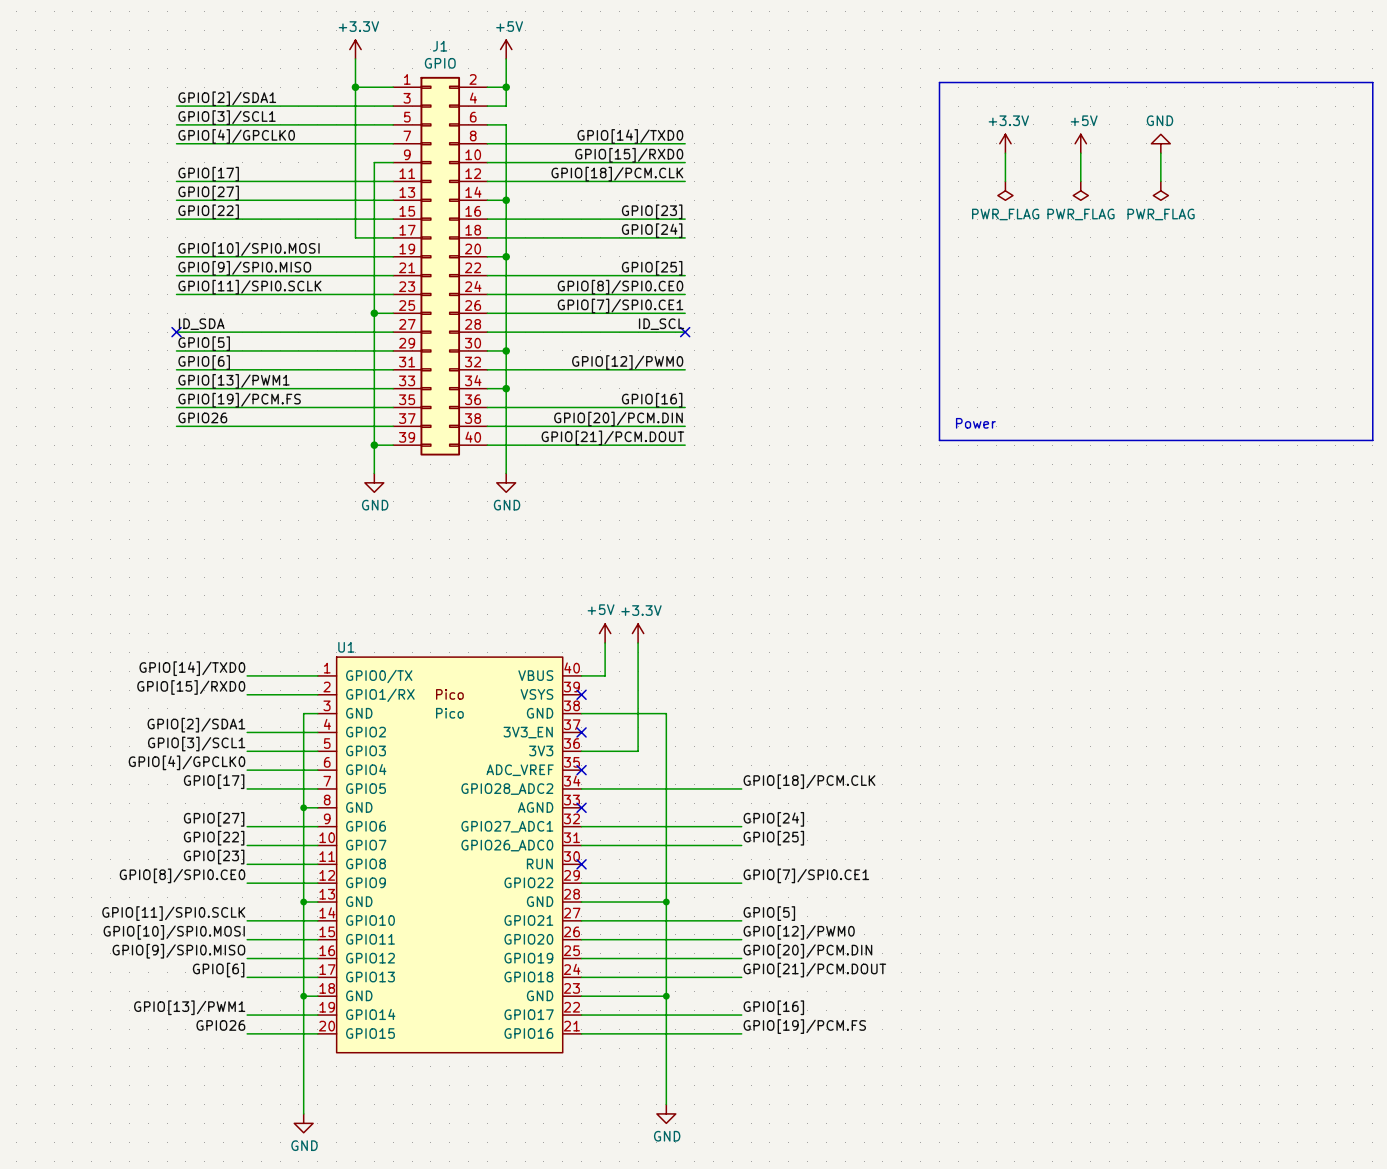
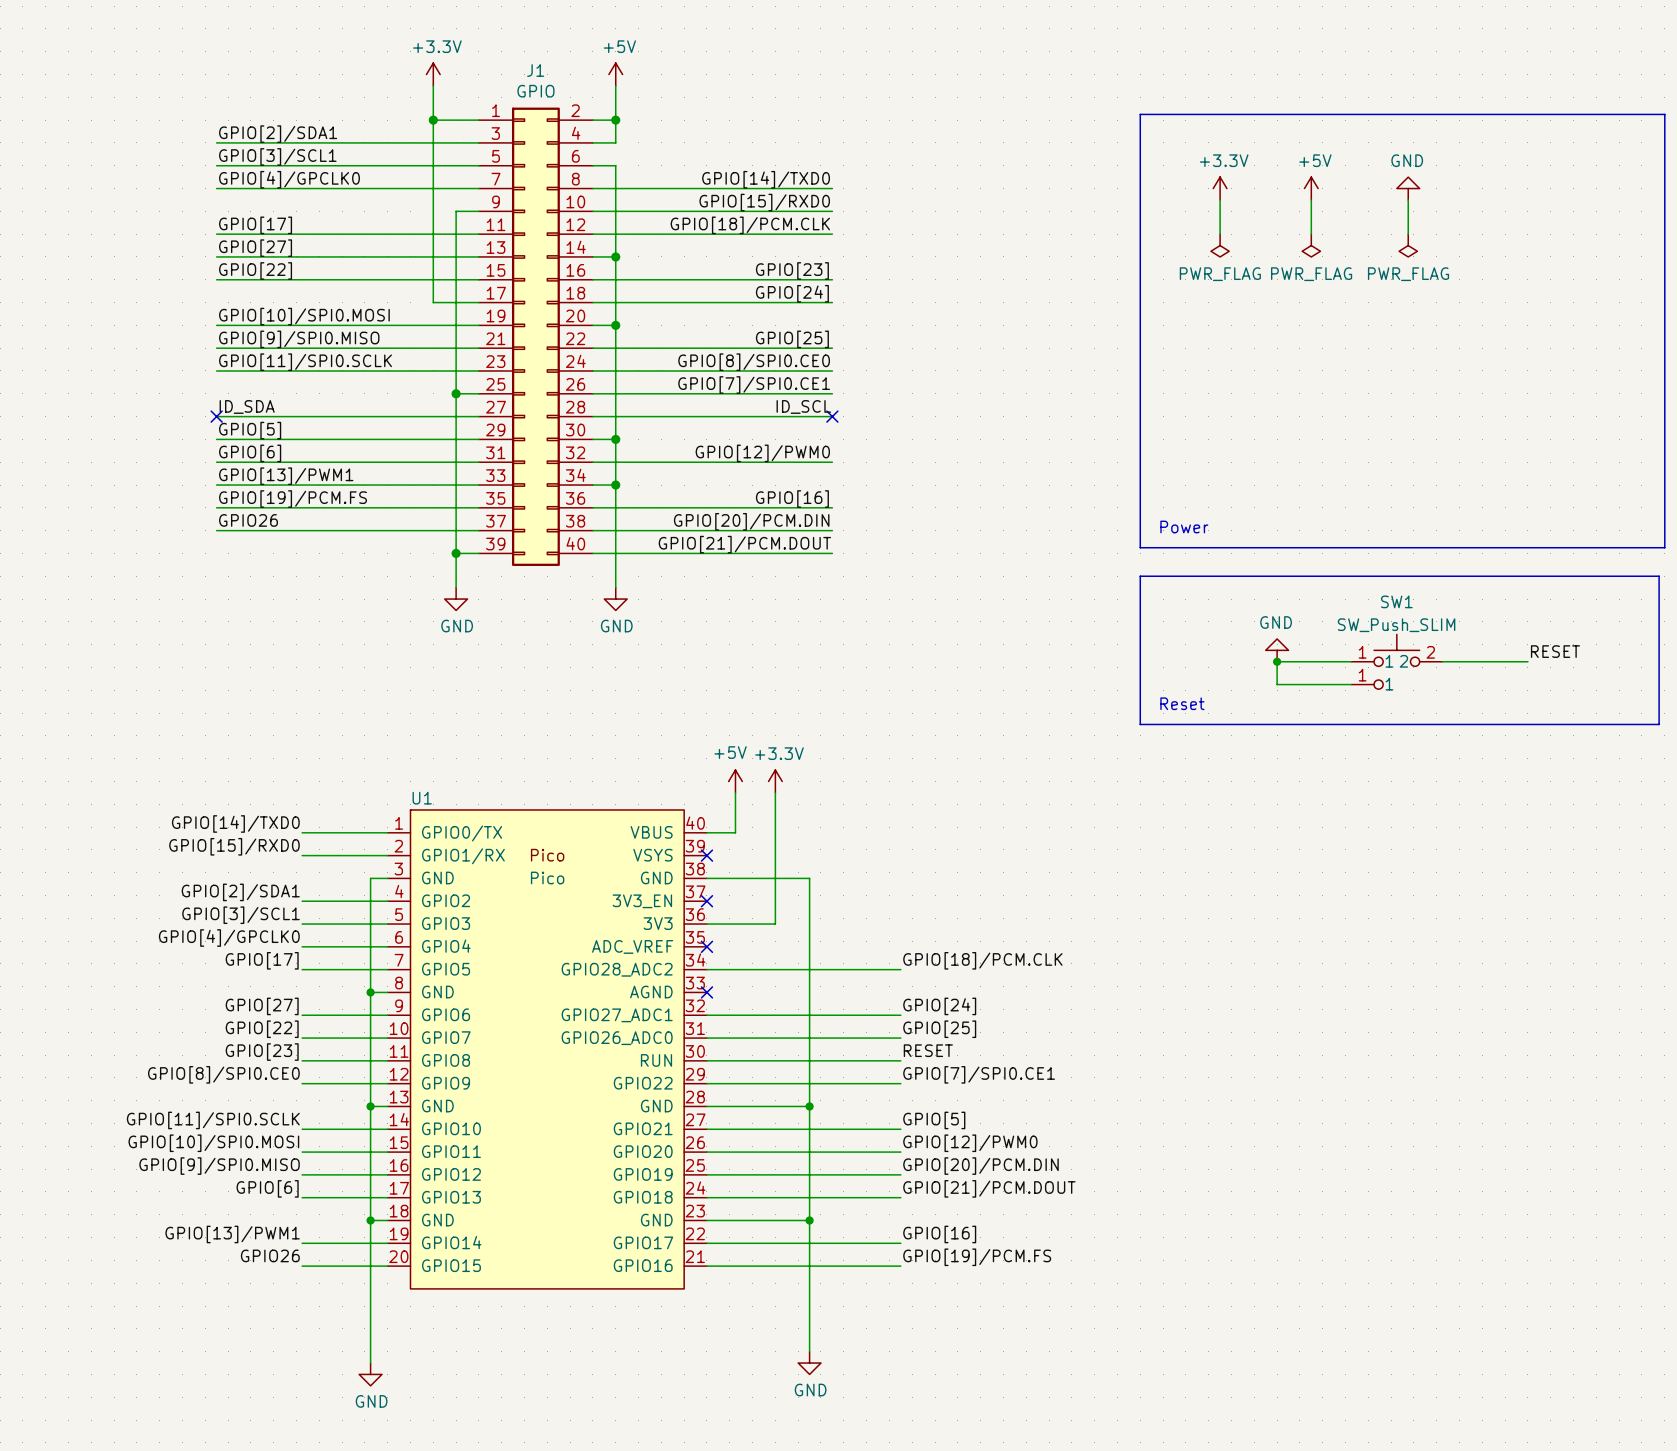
line: none -> (1140, 576) (1659, 576) (1659, 724) (1140, 724) (1140, 576)
power symbol: none -> GND (1277, 650)
label: none -> RESET (1555, 651)
junction: none -> (1277, 661)
wire: none -> (1351, 661) (1277, 661) (1277, 684) (1351, 684)
SW1: none -> SW_Push_SLIM (1396, 661)
wire: none -> (1442, 661) (1527, 661)
text: none -> Reset (1182, 703)
label: none -> RESET (928, 1050)
wire: none -> (706, 1060) (900, 1060)
no-connect mark: (581, 864) -> none

